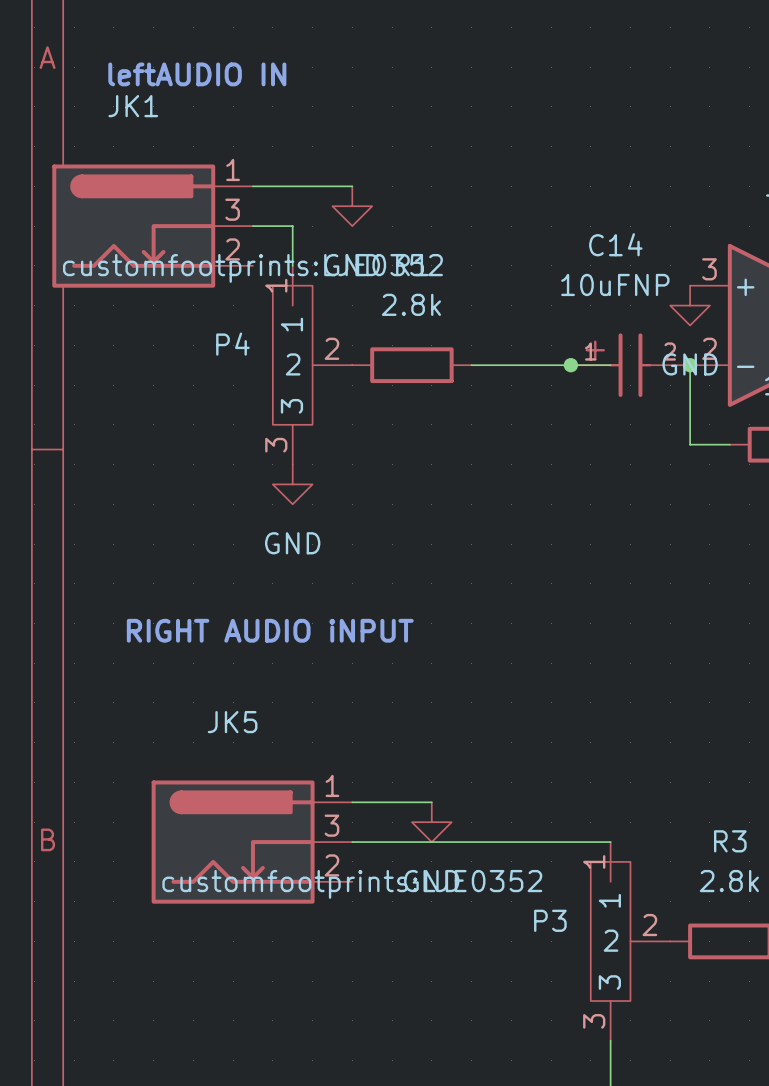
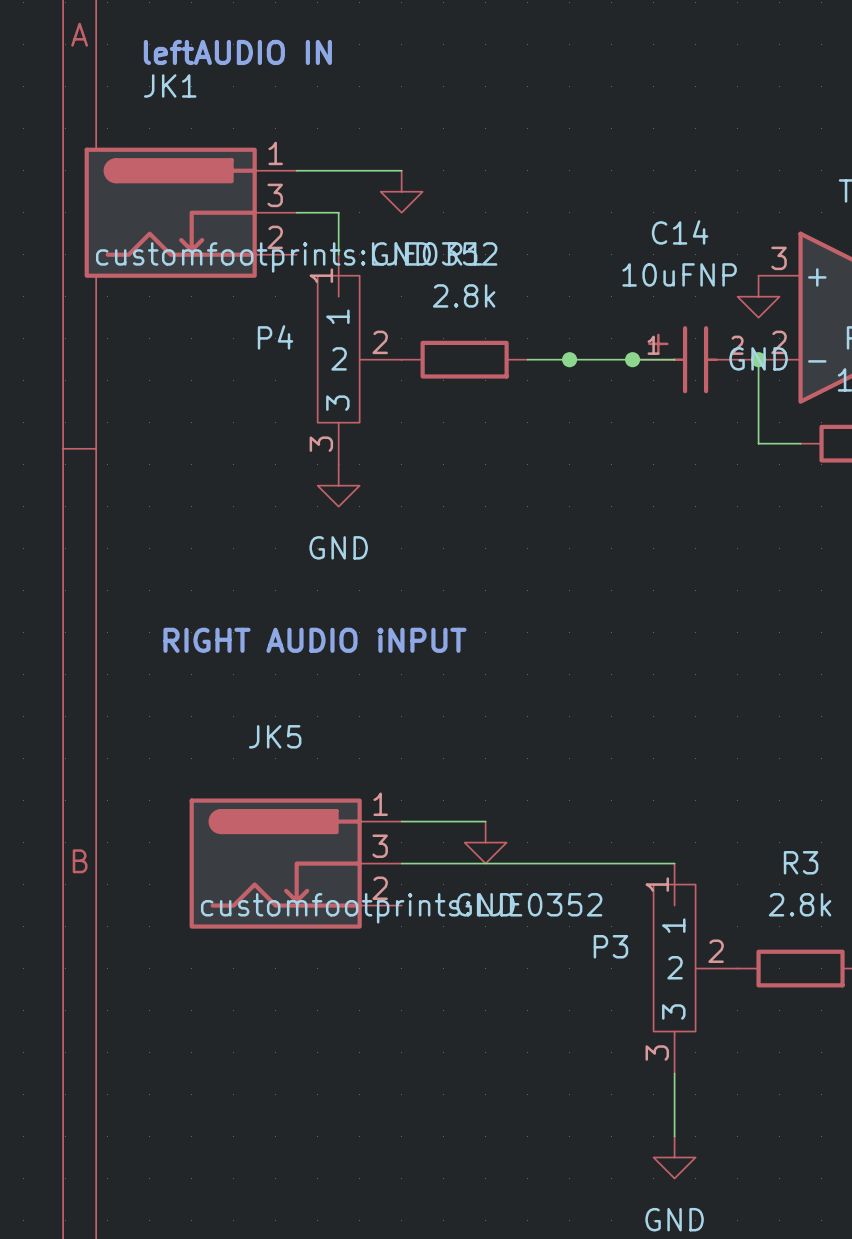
junction: none -> (569, 359)

